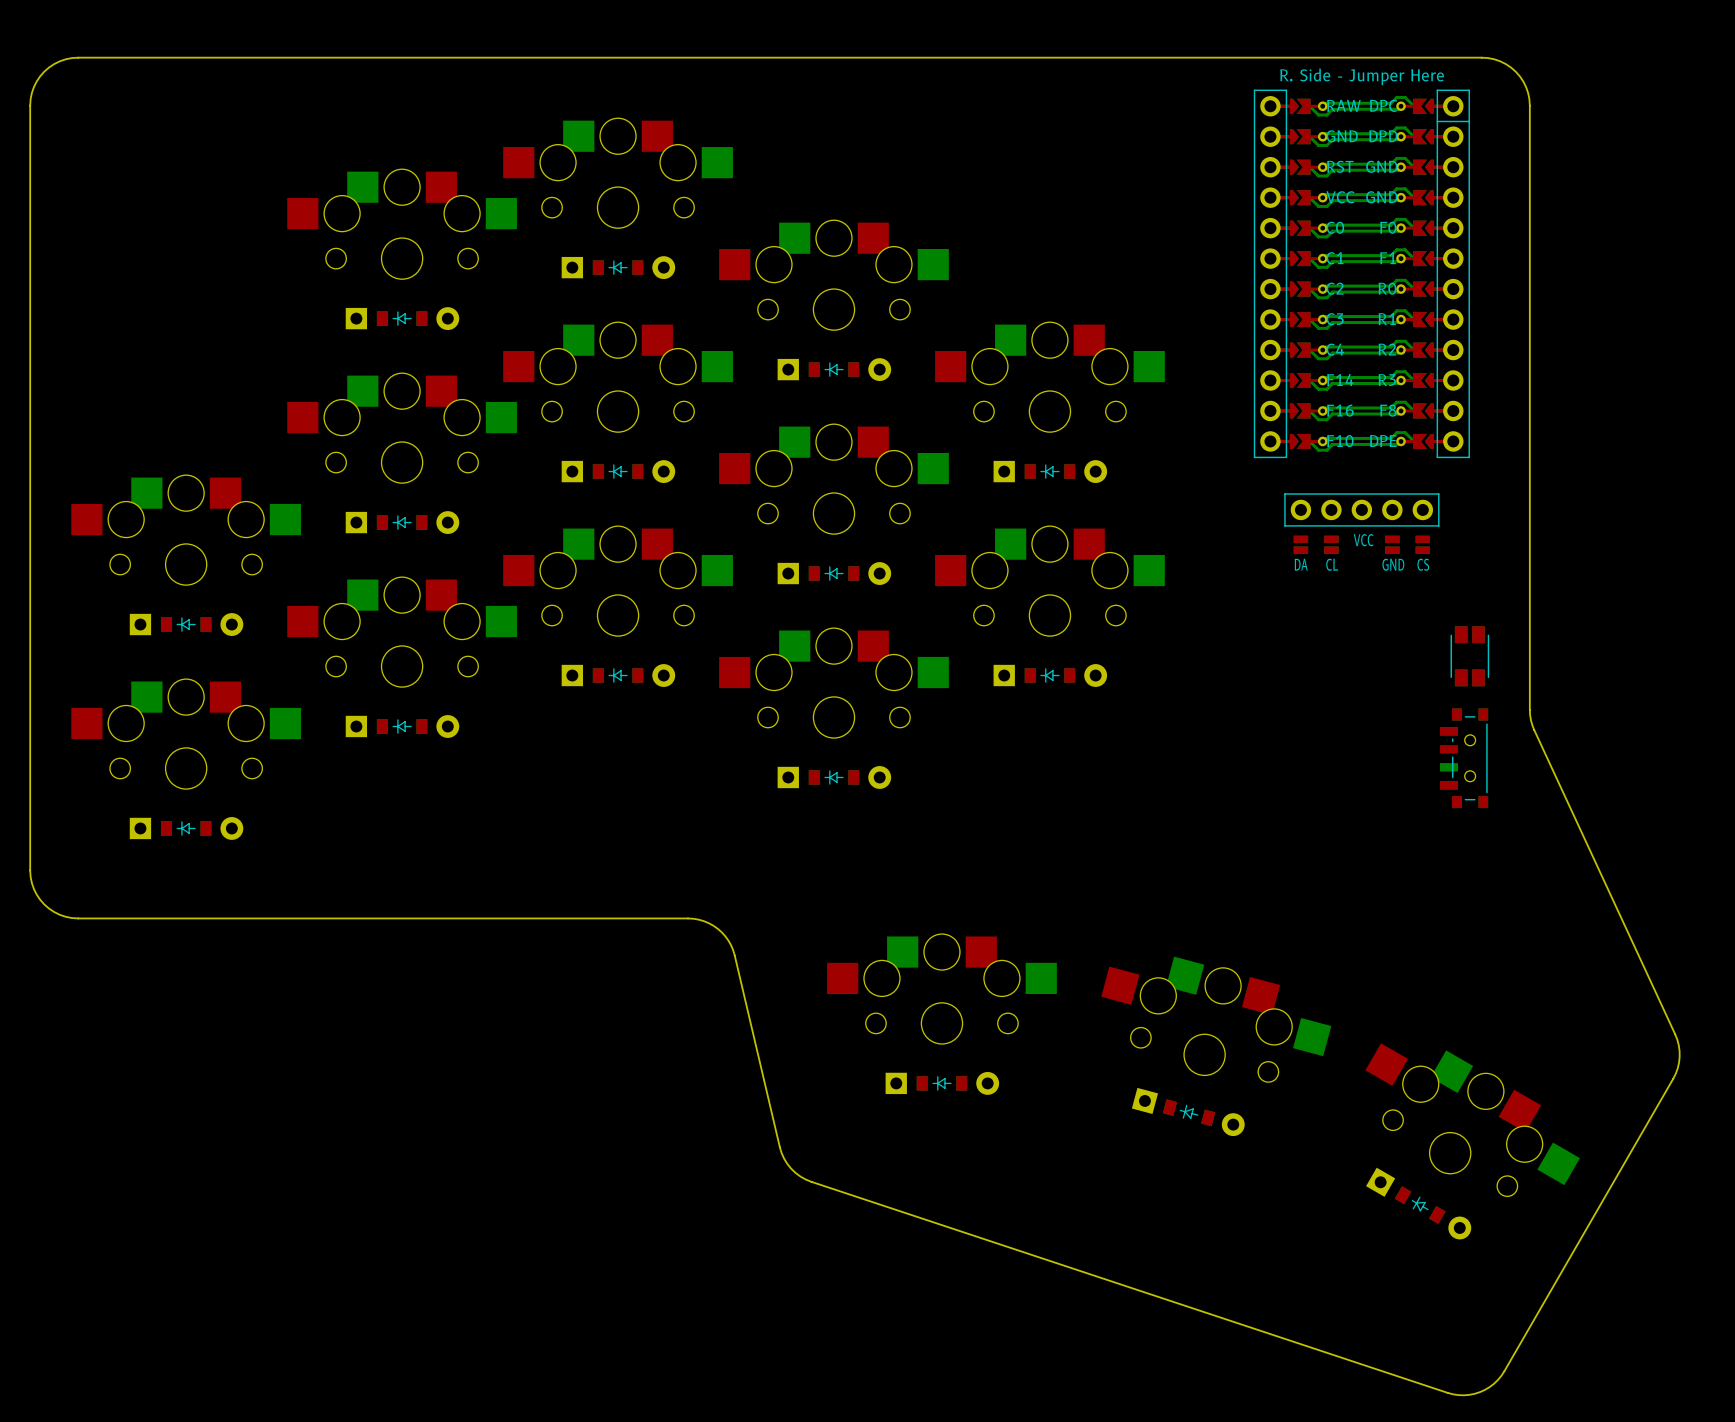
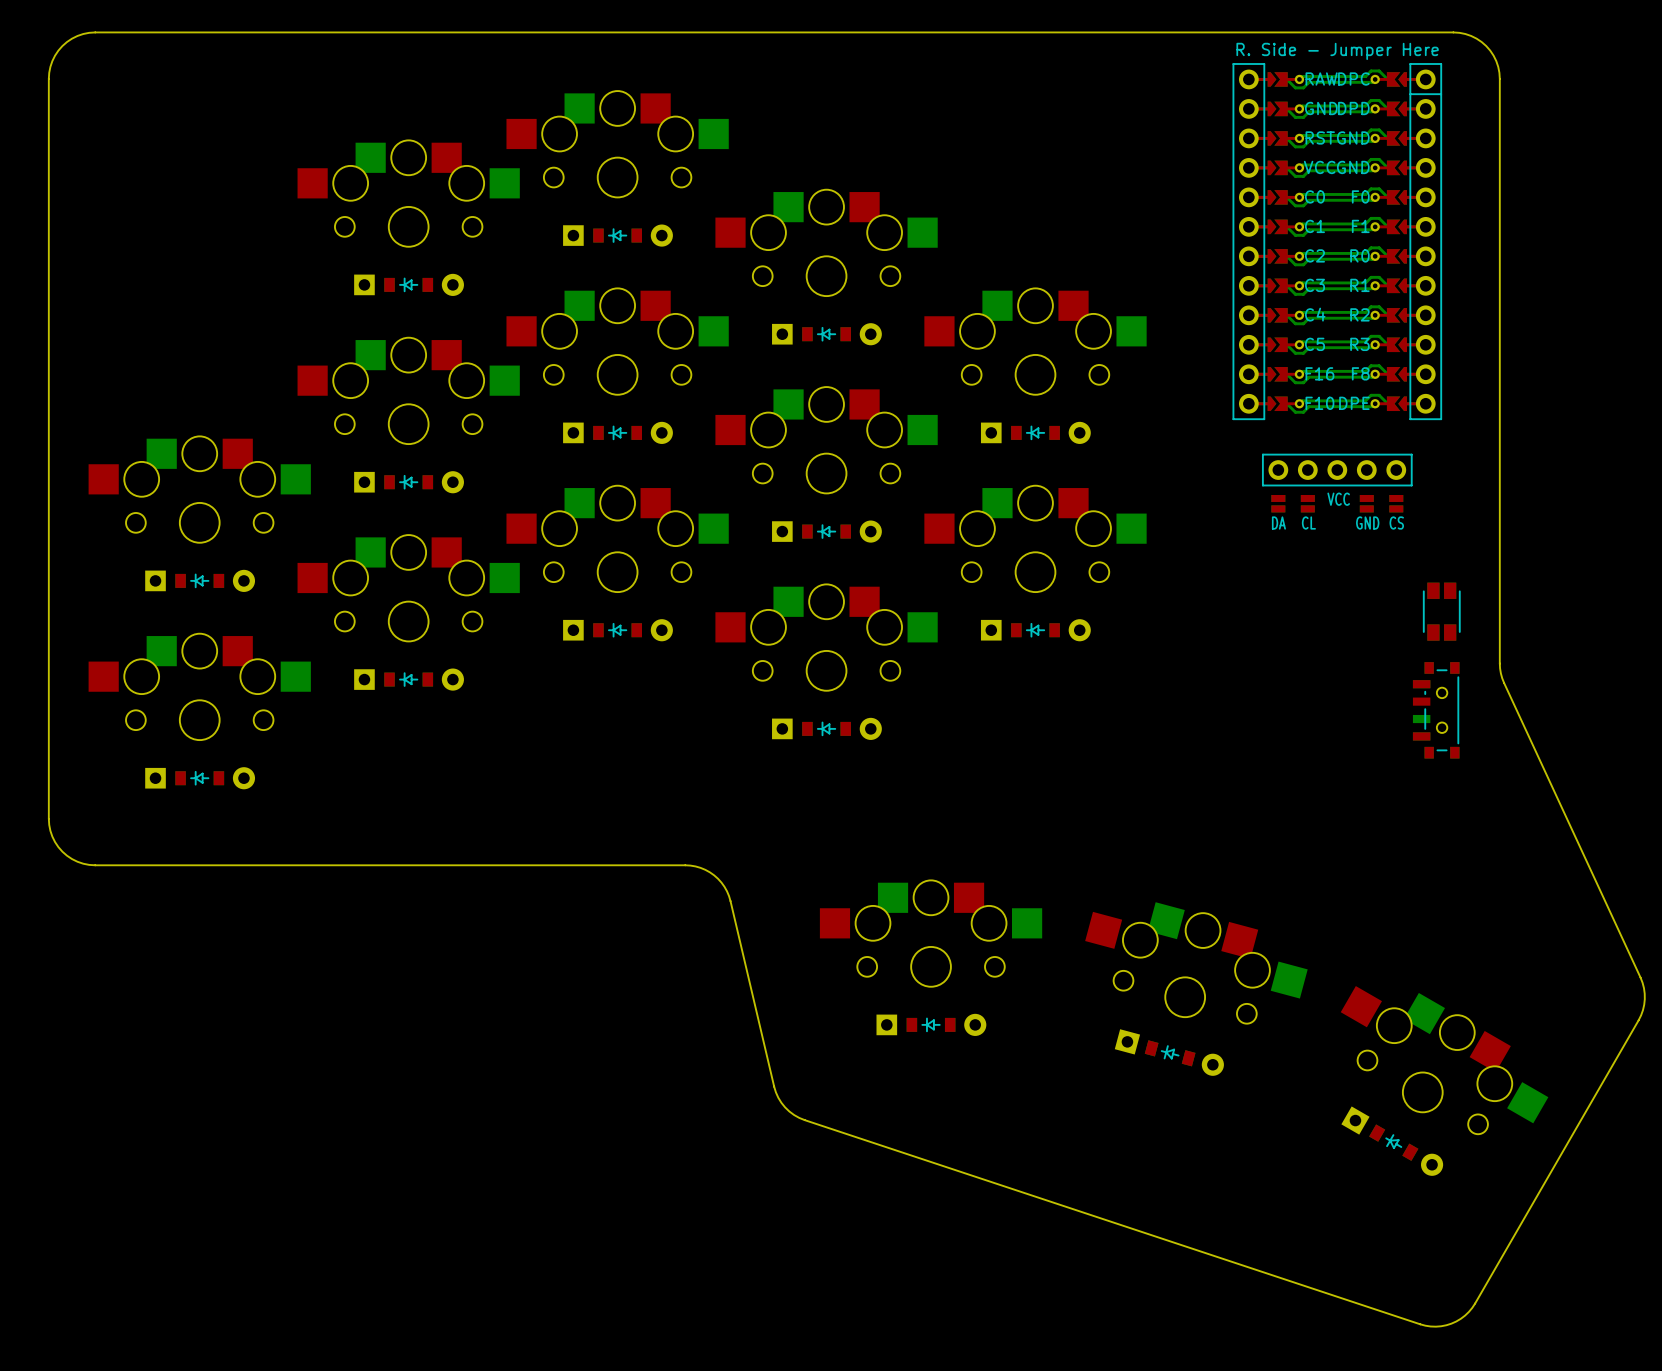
part text: F14 (1340, 380) -> C5 (1314, 344)

